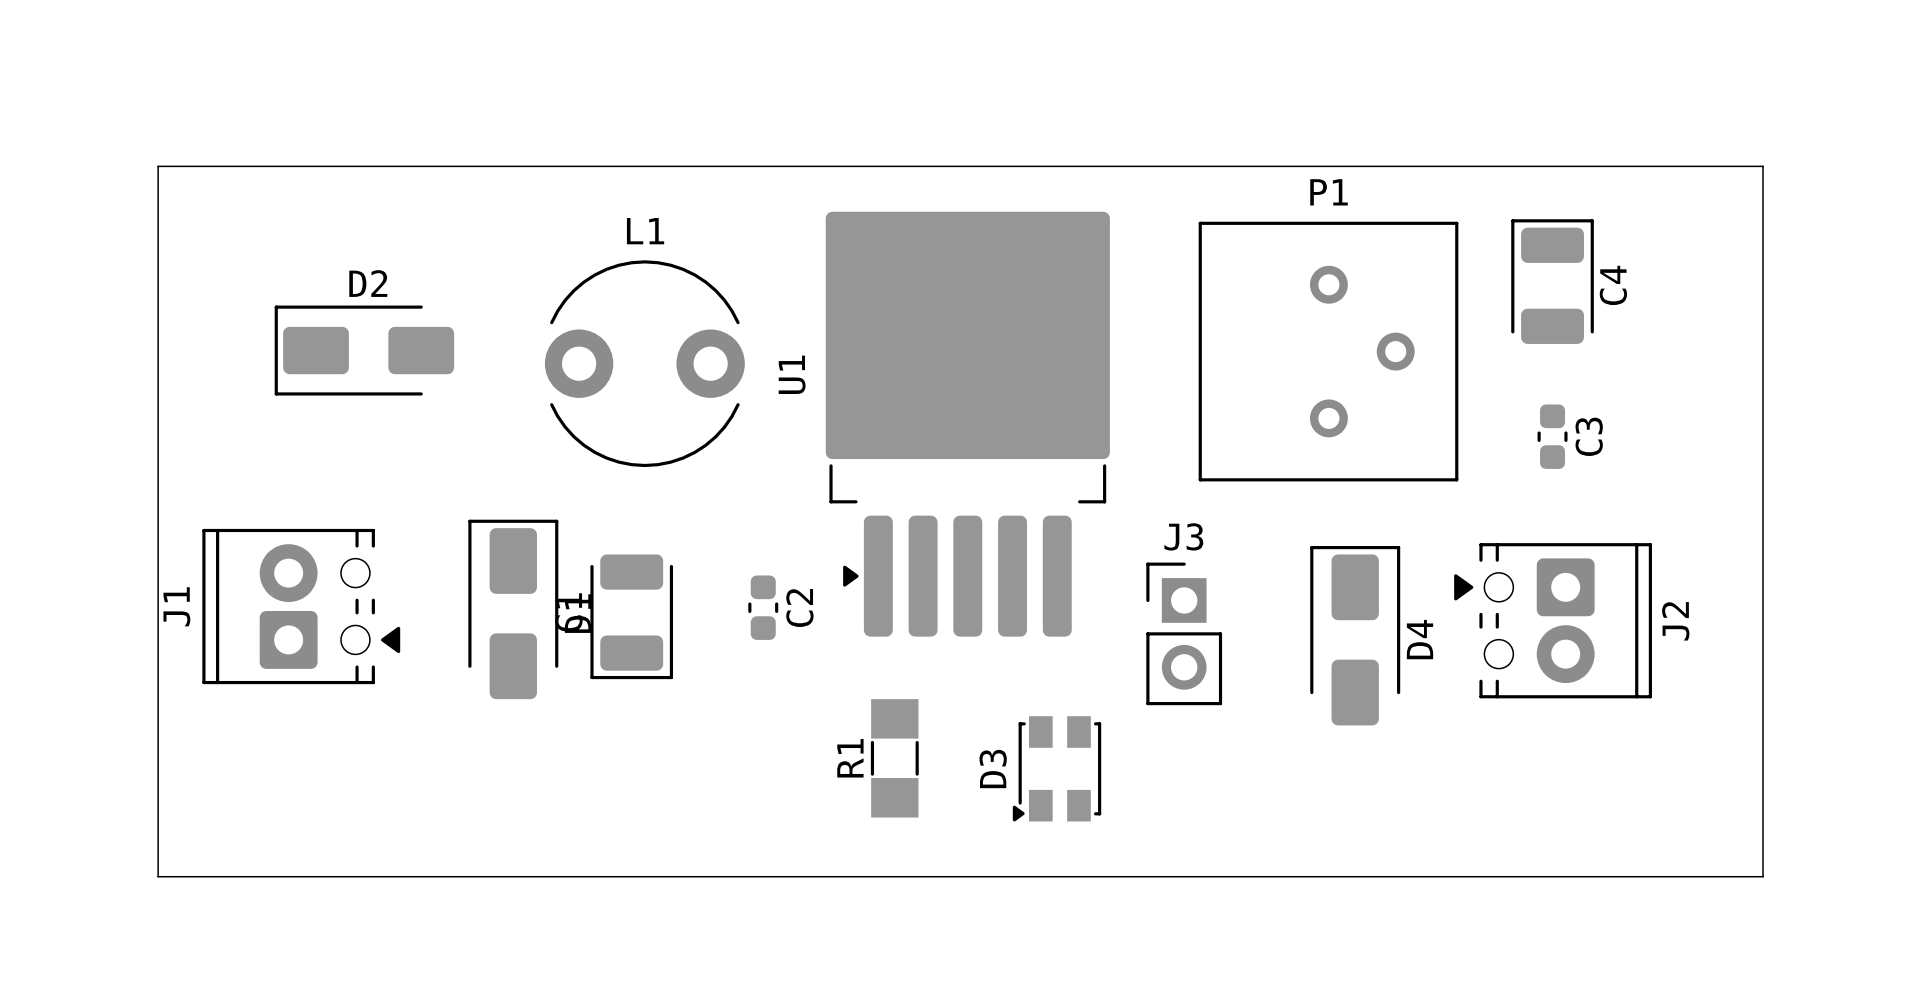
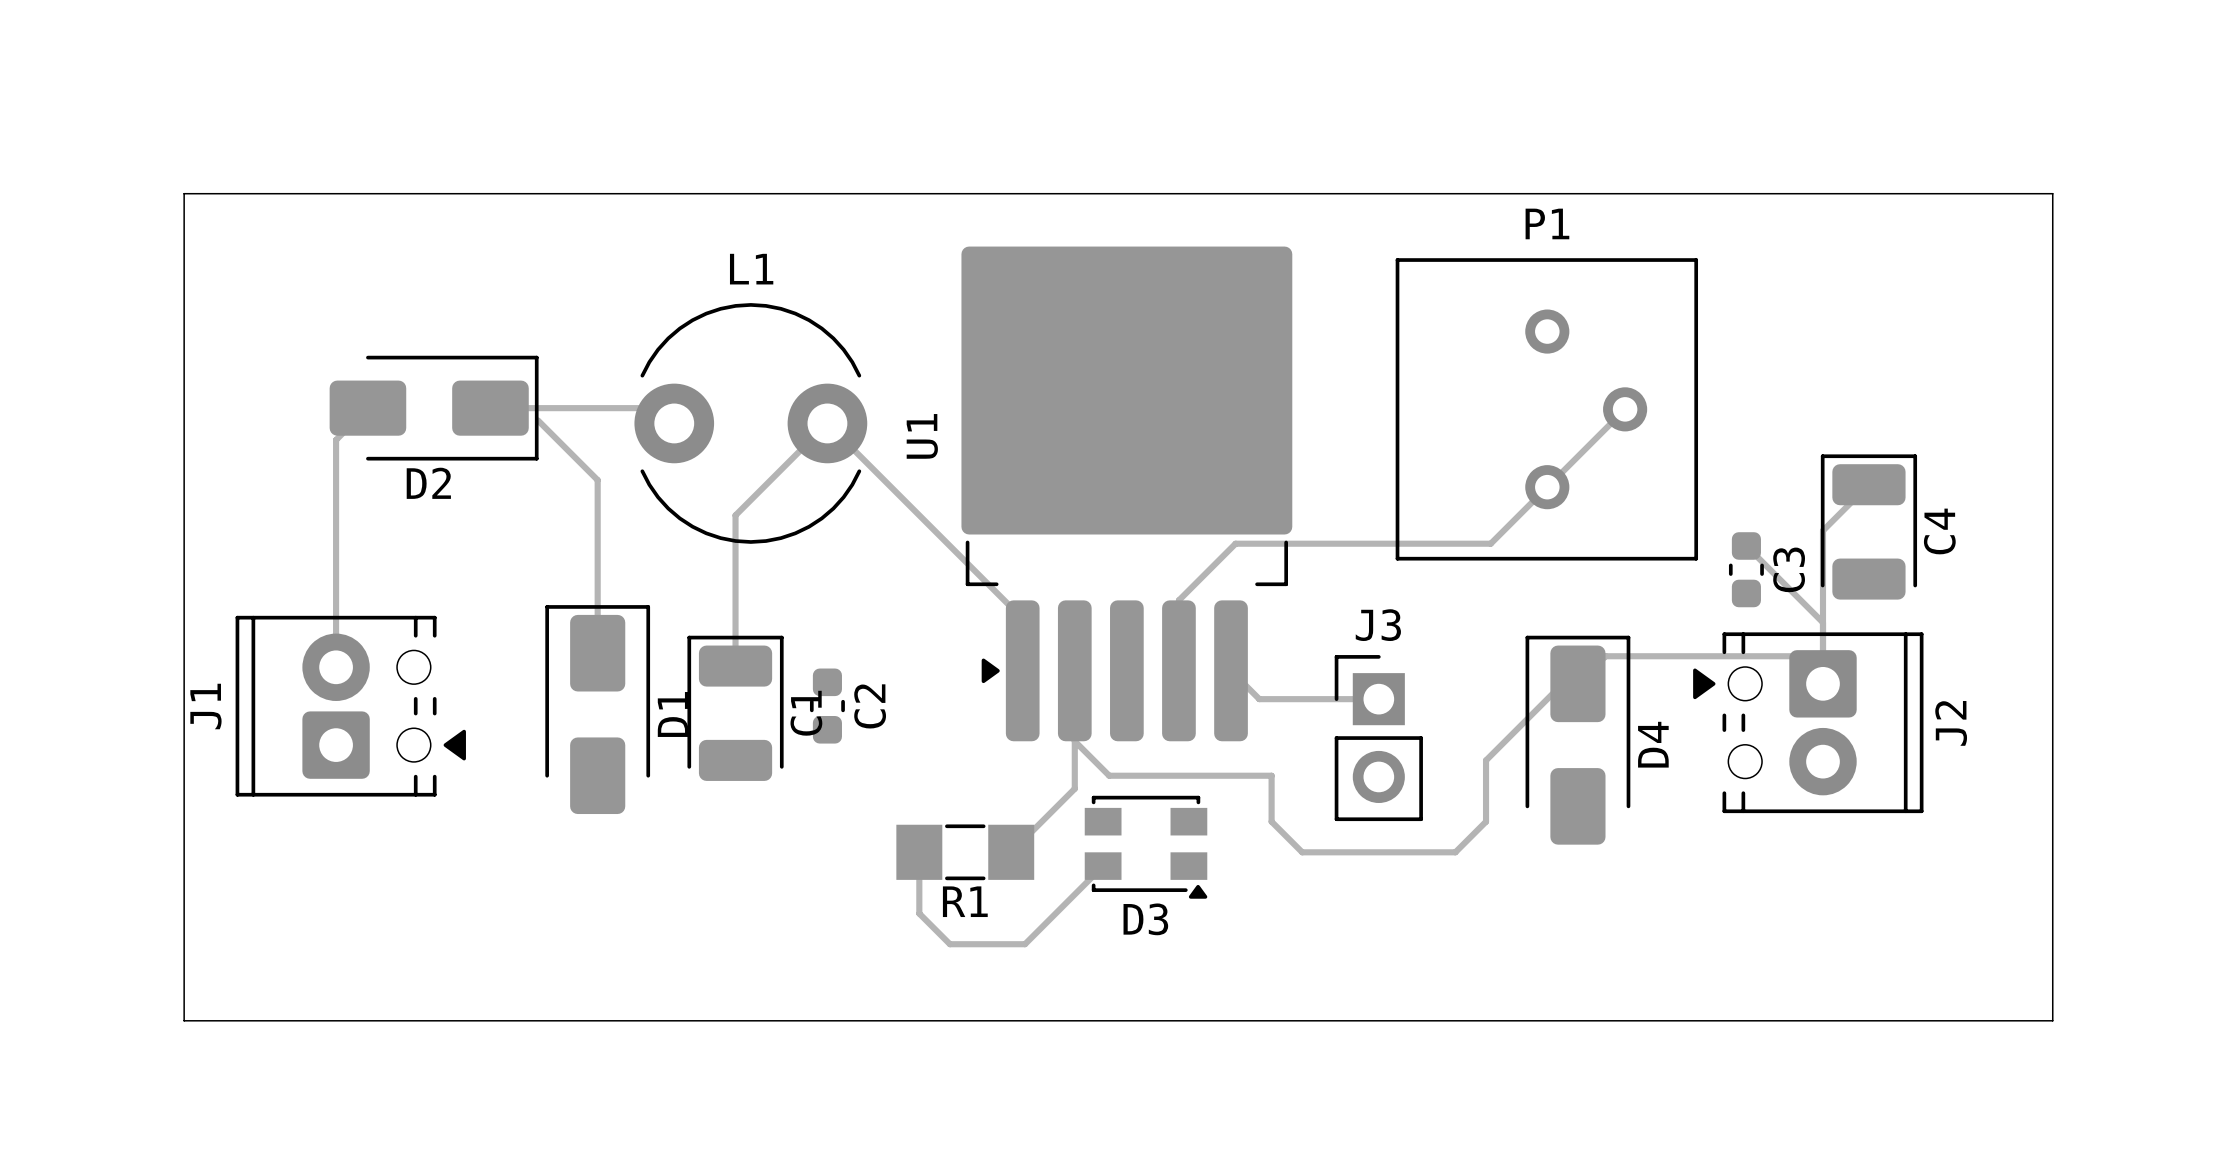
C4 position: (1552, 281) -> (1868, 526)
track: none -> (367, 408) (336, 439) (336, 667)
D2 rotation: 0° (364, 350) -> 180° (434, 408)
track: none -> (490, 408) (658, 408) (674, 423)
track: none -> (1625, 409) (1490, 543) (1235, 543) (1178, 600) (1178, 670)
track: none -> (537, 420) (597, 480) (597, 653)
track: none -> (1868, 484) (1823, 530) (1823, 683) (1795, 656) (1605, 656) (1577, 683) (1562, 683) (1486, 760) (1486, 821) (1455, 852) (1302, 852) (1271, 821) (1271, 775) (1109, 775) (1074, 741)
C3 position: (1552, 436) -> (1746, 569)
track: none -> (1746, 545) (1823, 622)
track: none -> (735, 666) (735, 515) (827, 423) (1022, 618) (1022, 670)
track: none -> (1074, 670) (1074, 788) (1011, 852)
track: none -> (1231, 670) (1259, 699) (1378, 699) (1363, 714)
C2 position: (763, 607) -> (827, 706)
C1 rotation: 0° (631, 616) -> 180° (735, 708)
track: none -> (919, 852) (919, 913) (949, 944) (1025, 944) (1103, 866)
R1 name position: R1 (850, 758) -> R1 (965, 901)
R1 rotation: 0° (894, 758) -> 90° clockwise (965, 852)
D3 rotation: 0° (1057, 768) -> 90° counterclockwise (1146, 847)
D3 position: (1057, 768) -> (1146, 847)

